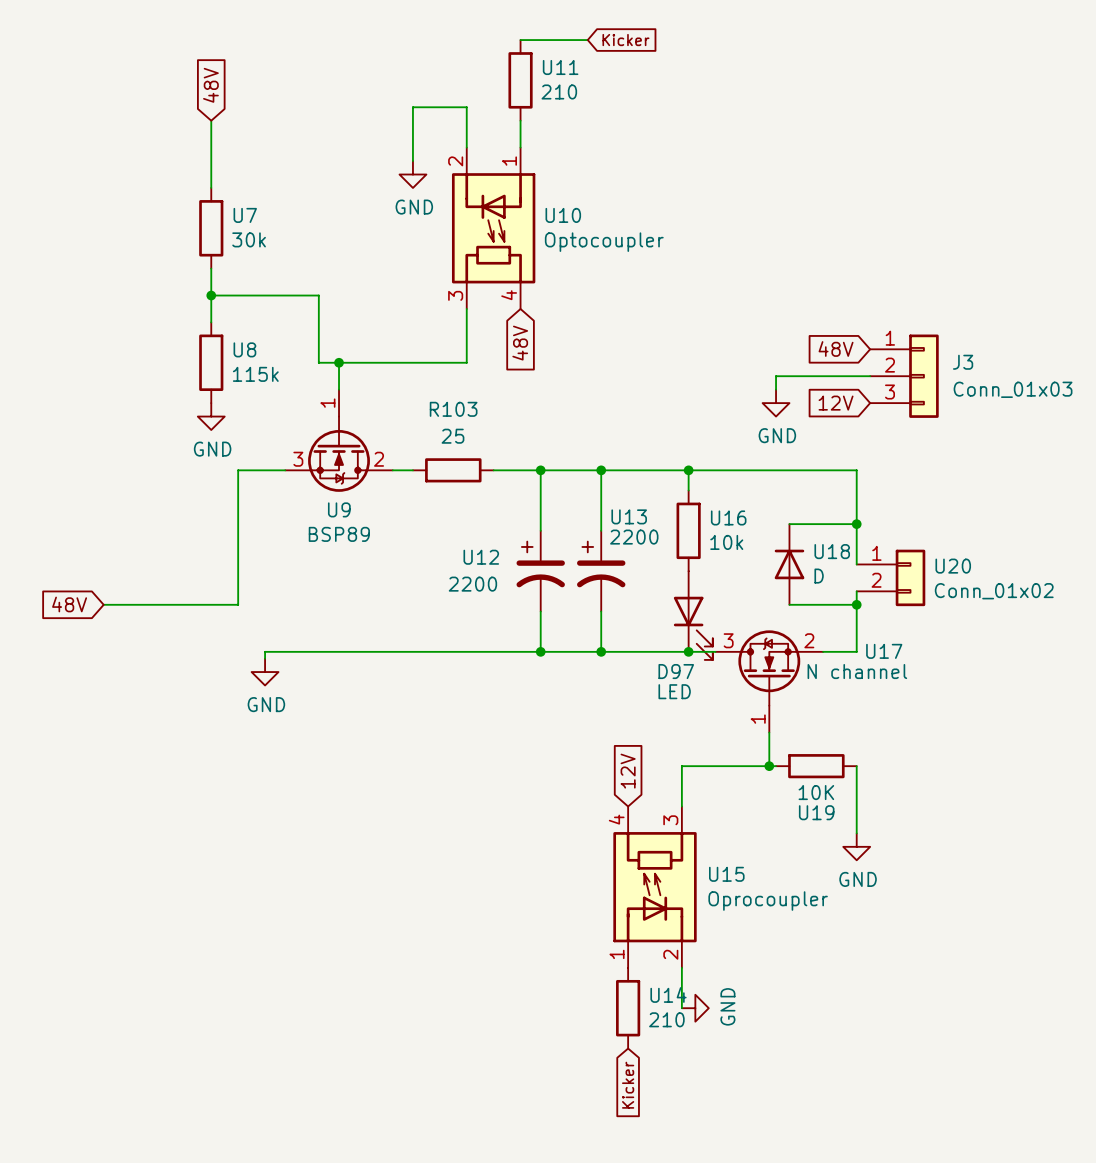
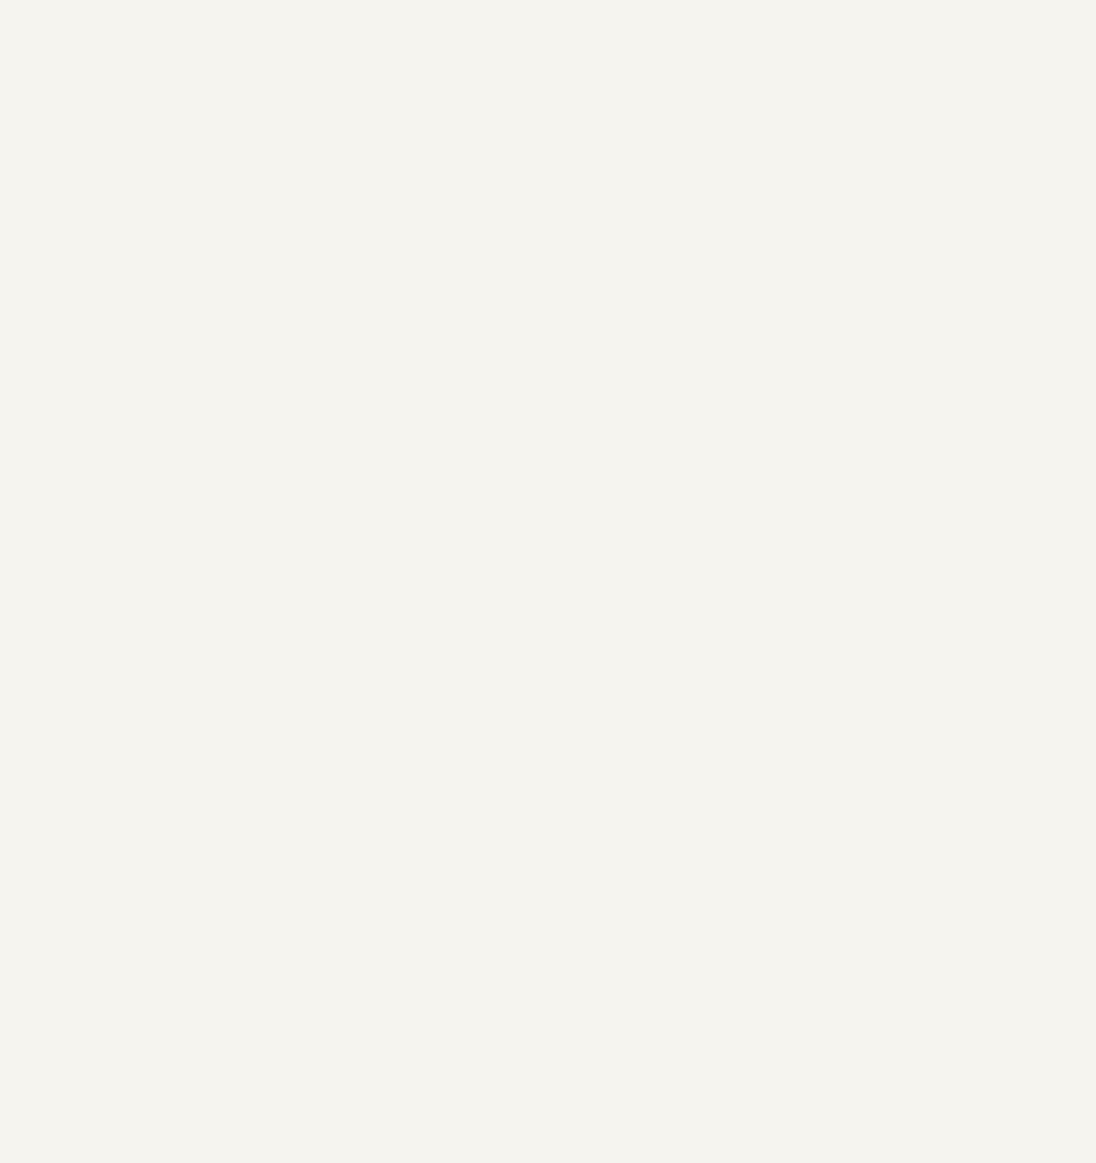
wire: (520, 40) (587, 40) -> none
global label: Kicker (625, 40) -> none
U11: 210 (520, 80) -> none
global label: 48V (210, 85) -> none
wire: (211, 120) (211, 187) -> none
wire: (520, 120) (520, 147) -> none
wire: (466, 147) (466, 107) (412, 107) (412, 161) -> none
power symbol: GND (412, 174) -> none
U7: 30k (211, 228) -> none
U10: Optocoupler (493, 228) -> none
wire: (211, 268) (211, 322) -> none
wire: (211, 295) (318, 295) (318, 362) (466, 362) (466, 308) -> none
junction: (211, 295) -> none
global label: 48V (520, 343) -> none
global label: 48V (836, 348) -> none
U8: 115k (211, 362) -> none
wire: (339, 362) (339, 389) -> none
junction: (339, 362) -> none
wire: (870, 376) (776, 376) (776, 389) -> none
J3: Conn_01x03 (904, 376) -> none
power symbol: GND (776, 403) -> none
global label: 12V (836, 403) -> none
power symbol: GND (211, 416) -> none
U9: BSP89 (339, 440) -> none
wire: (285, 470) (238, 470) (238, 604) (103, 604) -> none
wire: (392, 470) (412, 470) -> none
R103: 25 (453, 470) -> none
wire: (493, 470) (856, 470) (856, 564) -> none
wire: (540, 470) (540, 530) -> none
junction: (540, 470) -> none
wire: (601, 470) (601, 530) -> none
junction: (601, 470) -> none
wire: (688, 470) (688, 490) -> none
junction: (688, 470) -> none
wire: (789, 524) (856, 524) -> none
junction: (856, 524) -> none
U16: 10k (688, 530) -> none
U18: D (789, 564) -> none
U12: 2200 (540, 571) -> none
U13: 2200 (601, 571) -> none
U20: Conn_01x02 (891, 577) -> none
wire: (856, 591) (856, 651) (823, 651) -> none
global label: 48V (69, 604) -> none
wire: (789, 604) (856, 604) -> none
junction: (856, 604) -> none
wire: (540, 611) (540, 651) -> none
wire: (601, 611) (601, 651) -> none
D97: LED (693, 615) -> none
junction: (540, 651) -> none
junction: (601, 651) -> none
junction: (688, 651) -> none
wire: (715, 651) (265, 651) (265, 658) -> none
power symbol: GND (265, 672) -> none
U17: N channel (769, 681) -> none
wire: (769, 732) (769, 766) -> none
junction: (769, 766) -> none
wire: (776, 766) (681, 766) (681, 806) -> none
U19: 10K (816, 766) -> none
wire: (856, 766) (856, 833) -> none
global label: 12V (628, 771) -> none
power symbol: GND (856, 846) -> none
U15: Oprocoupler (655, 887) -> none
wire: (681, 967) (681, 1008) -> none
U14: 210 (628, 1008) -> none
power symbol: GND (695, 1008) -> none
global label: Kicker (628, 1085) -> none

